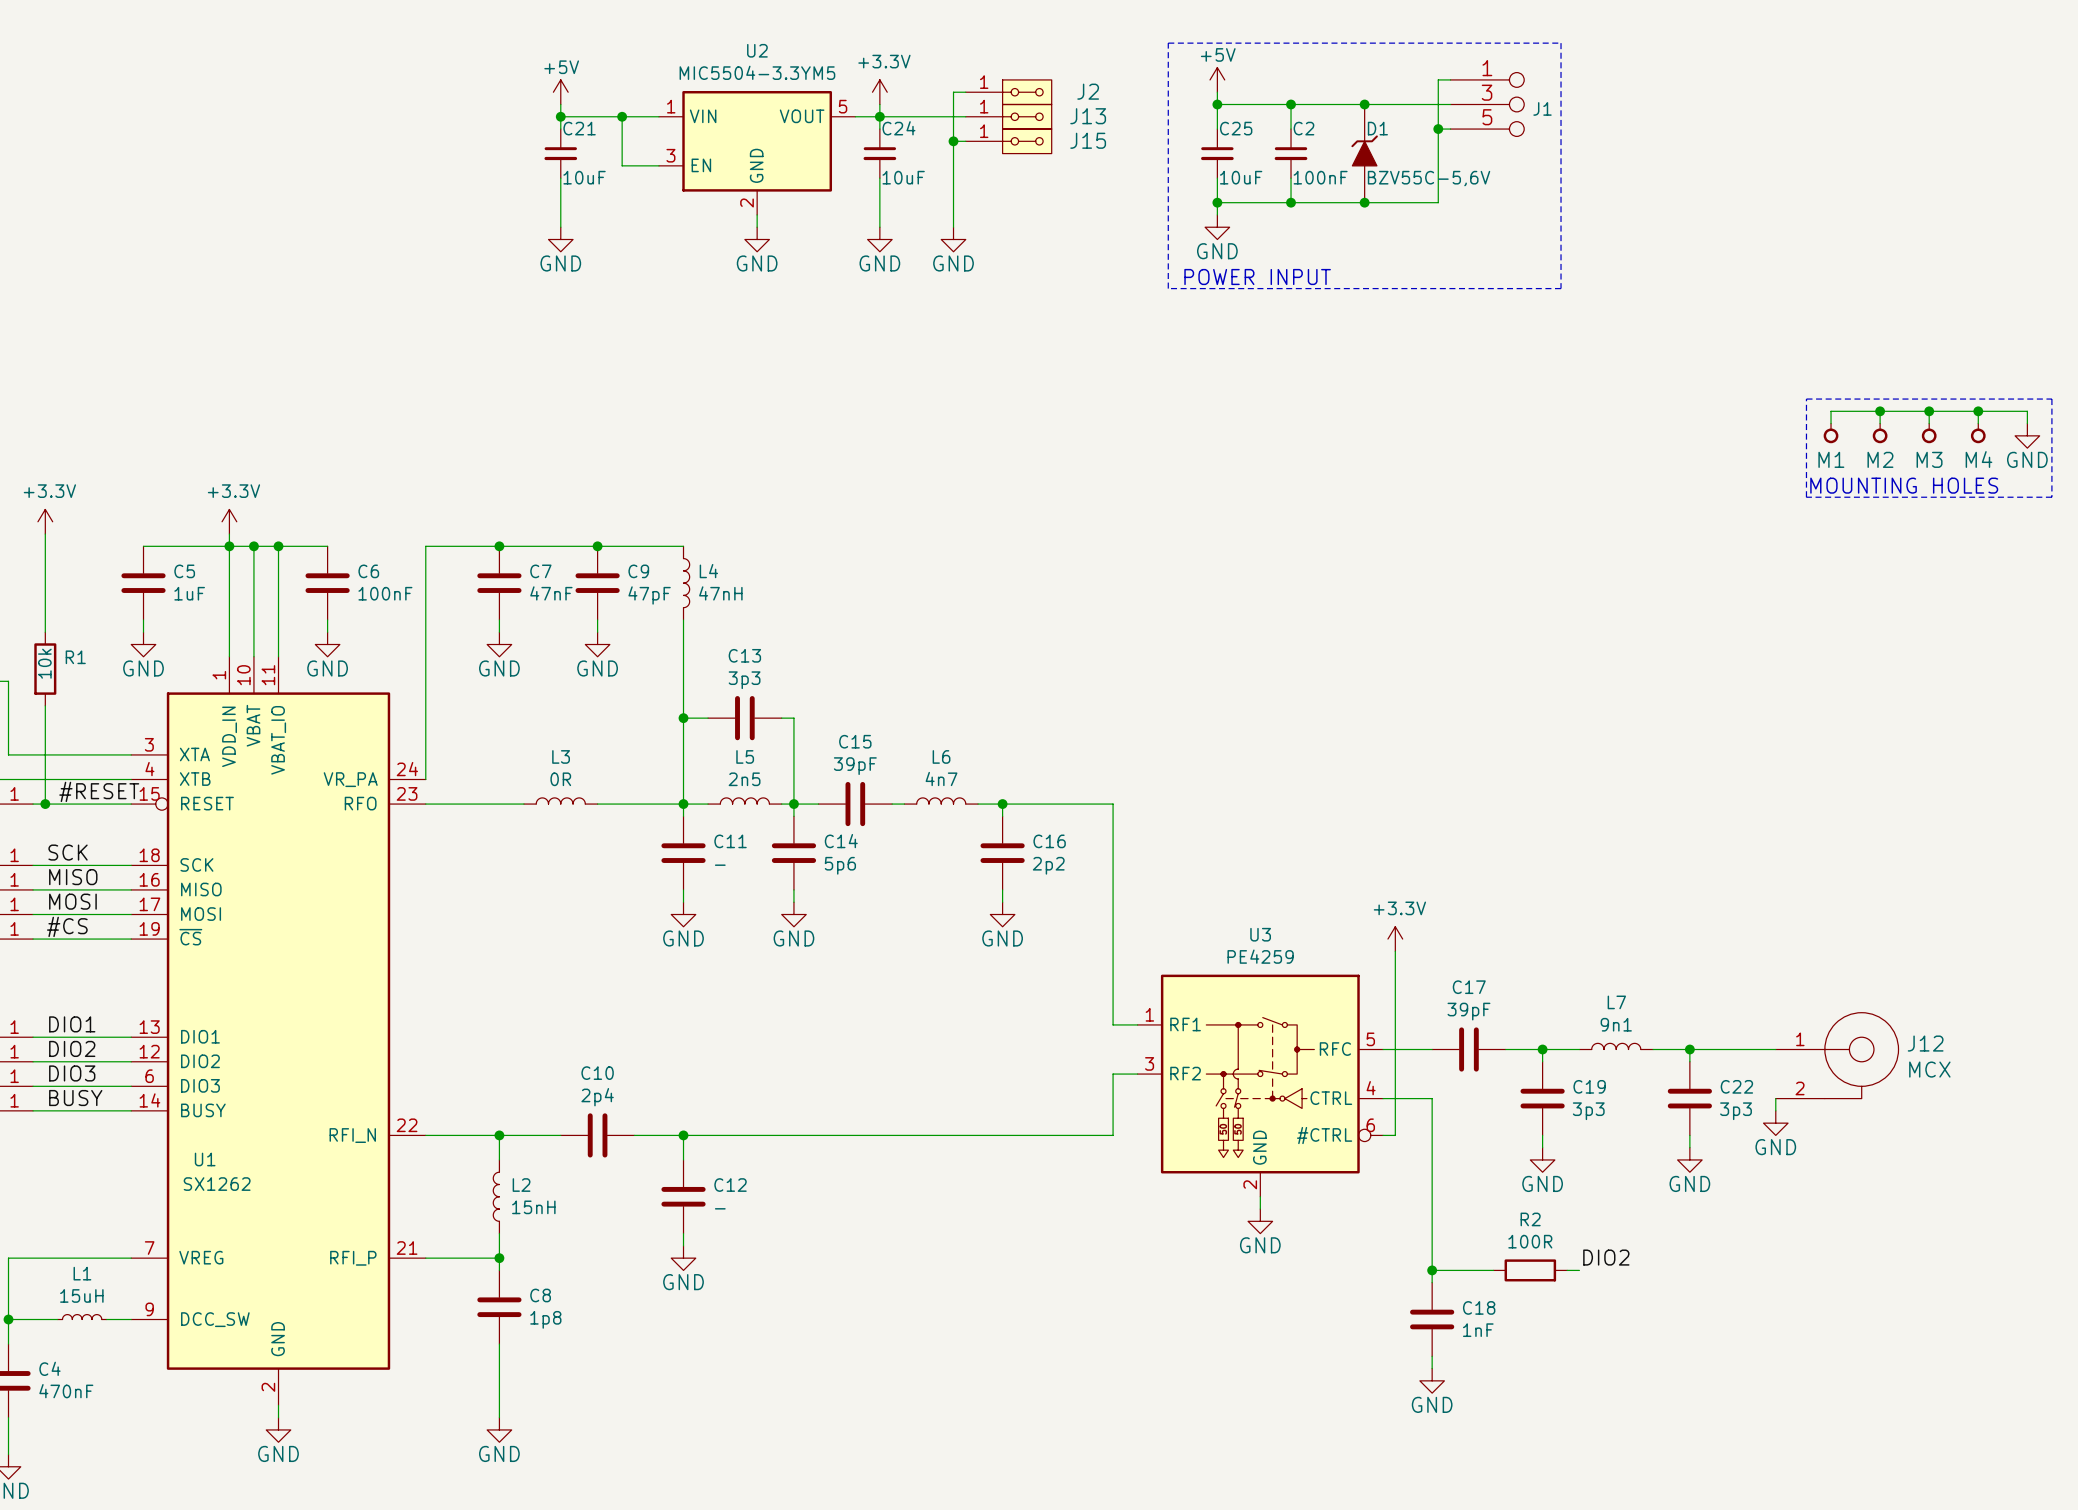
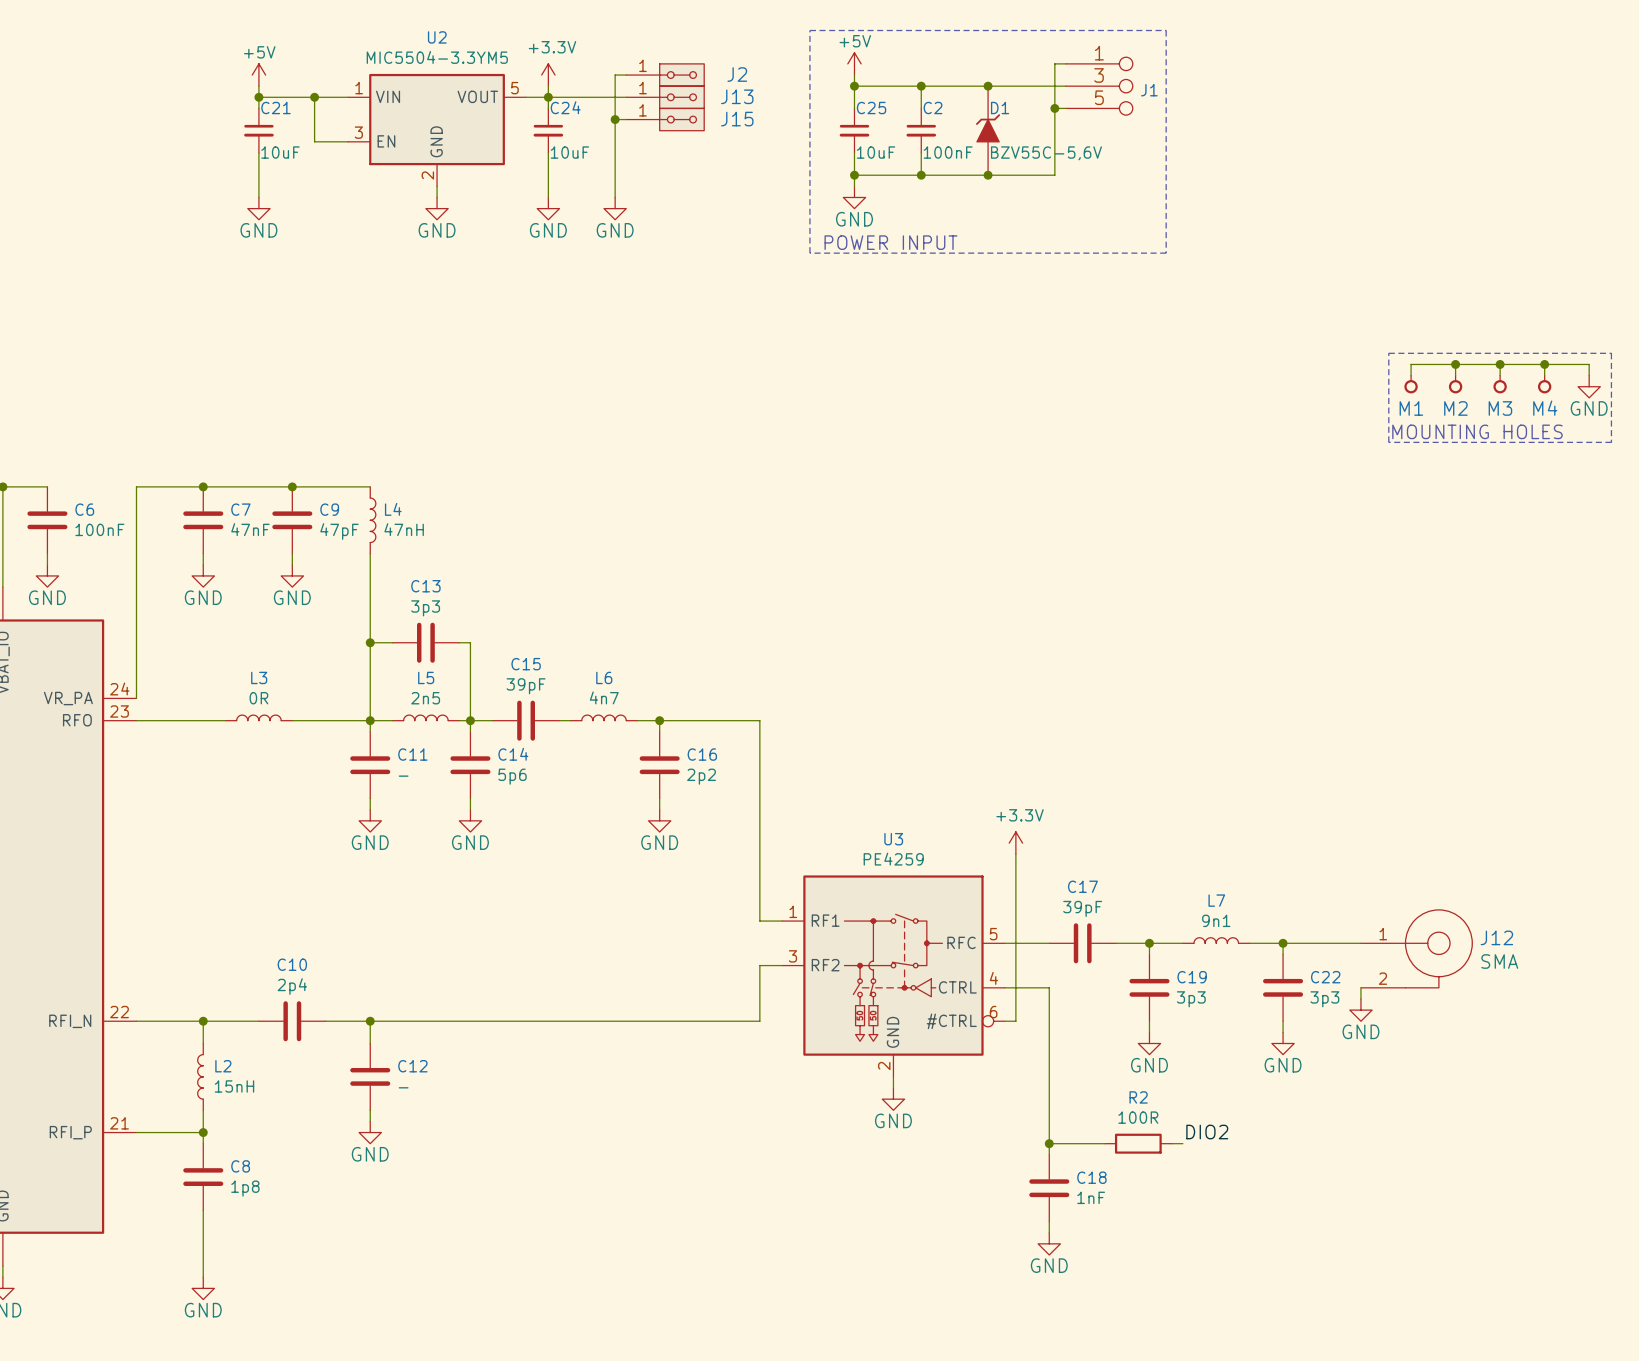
J12 value: MCX (1929, 1069) -> SMA (1499, 961)

